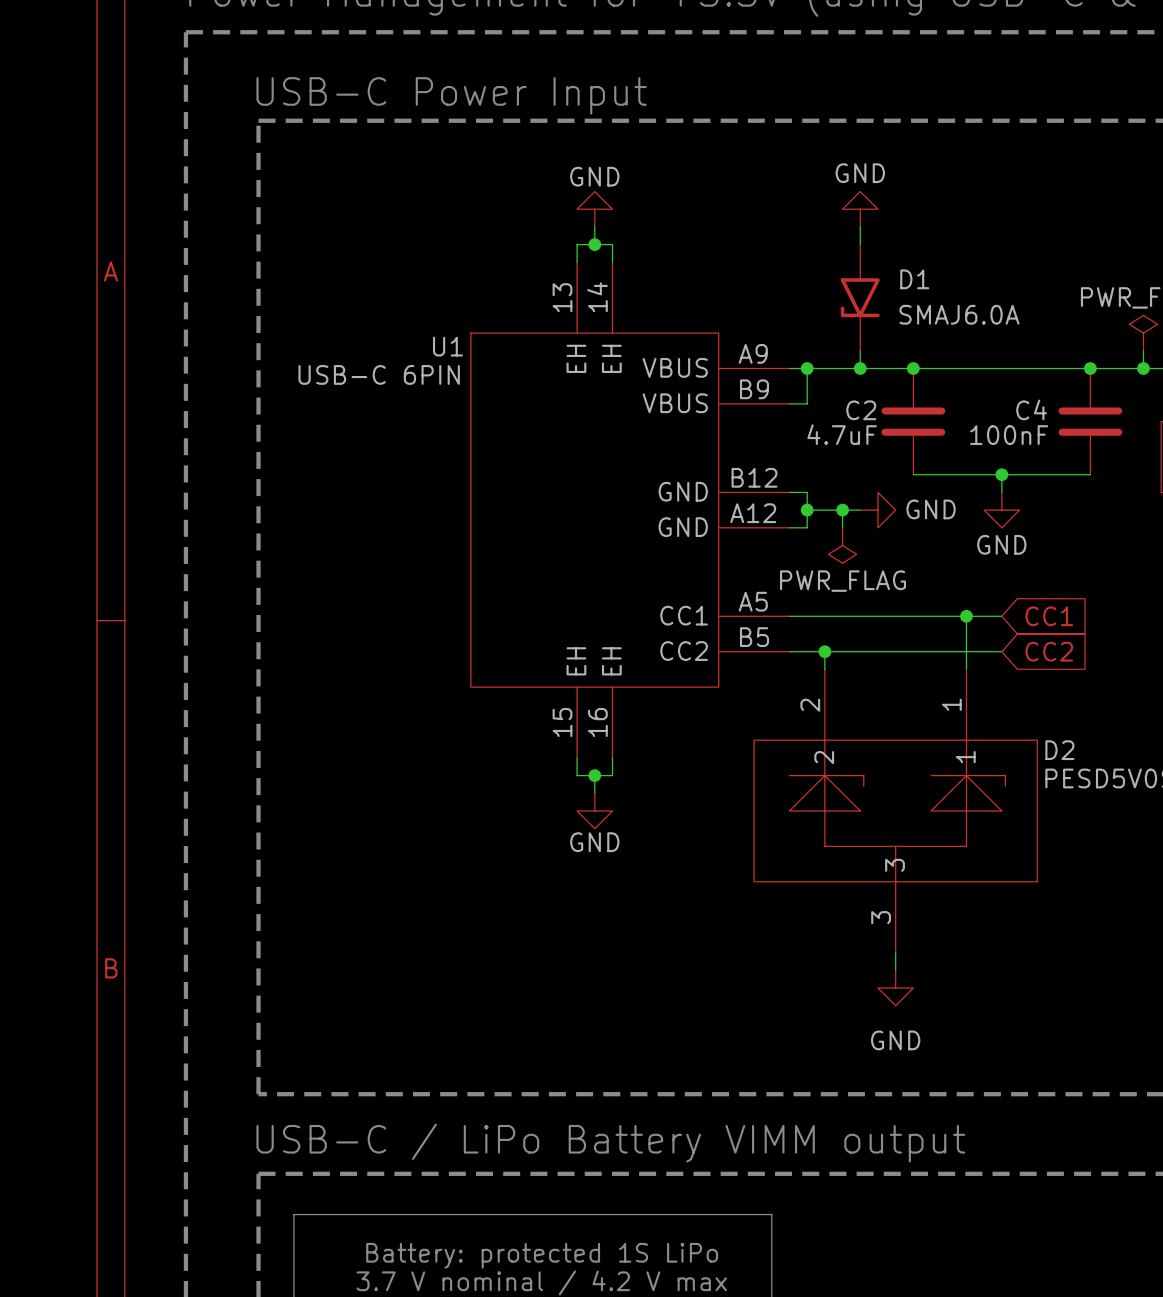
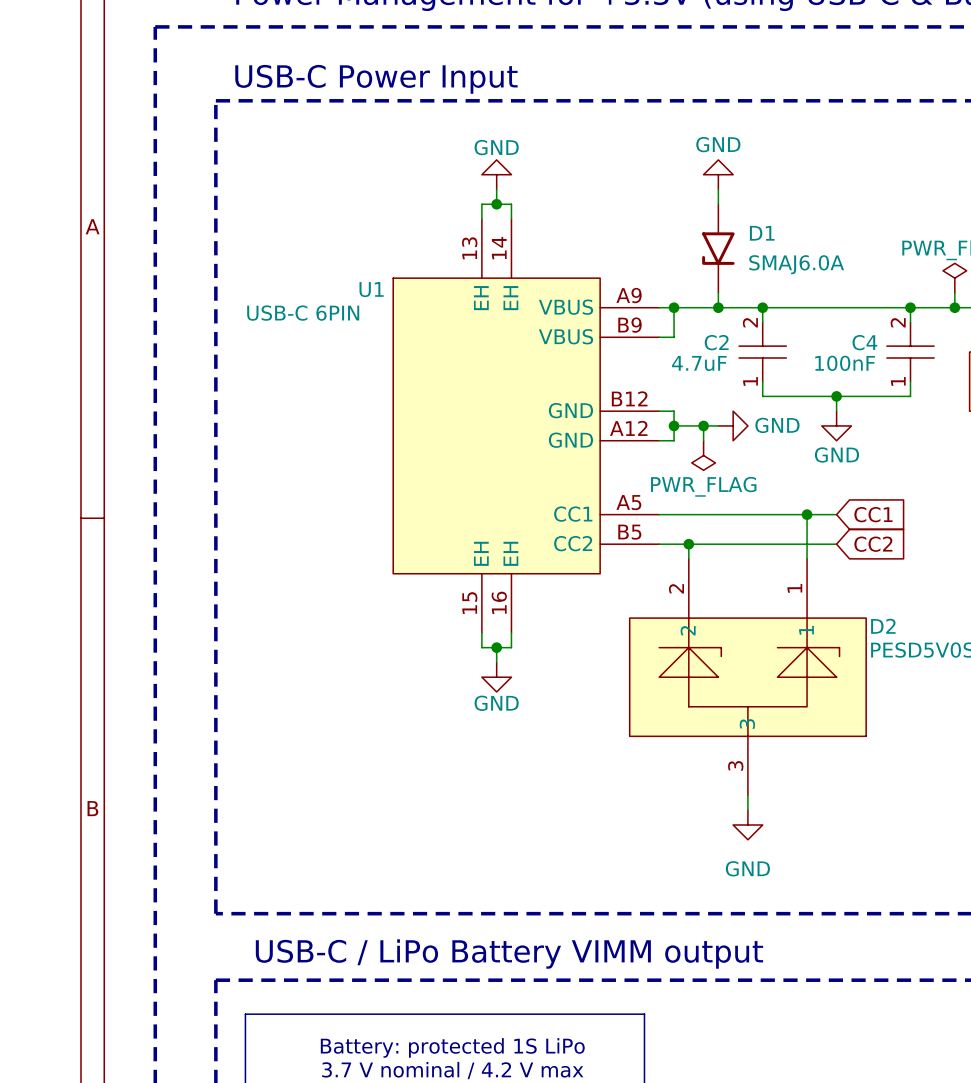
C2 symbol: [881, 368, 946, 475] -> [739, 322, 787, 382]
C4 symbol: [1058, 368, 1123, 475] -> [886, 322, 935, 382]

